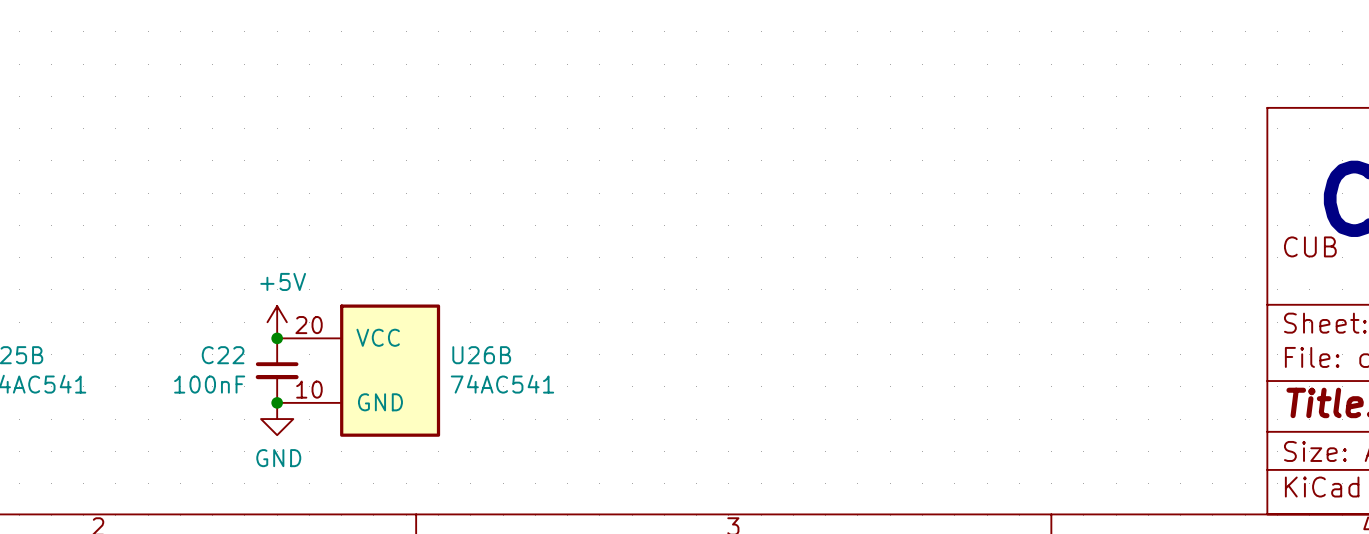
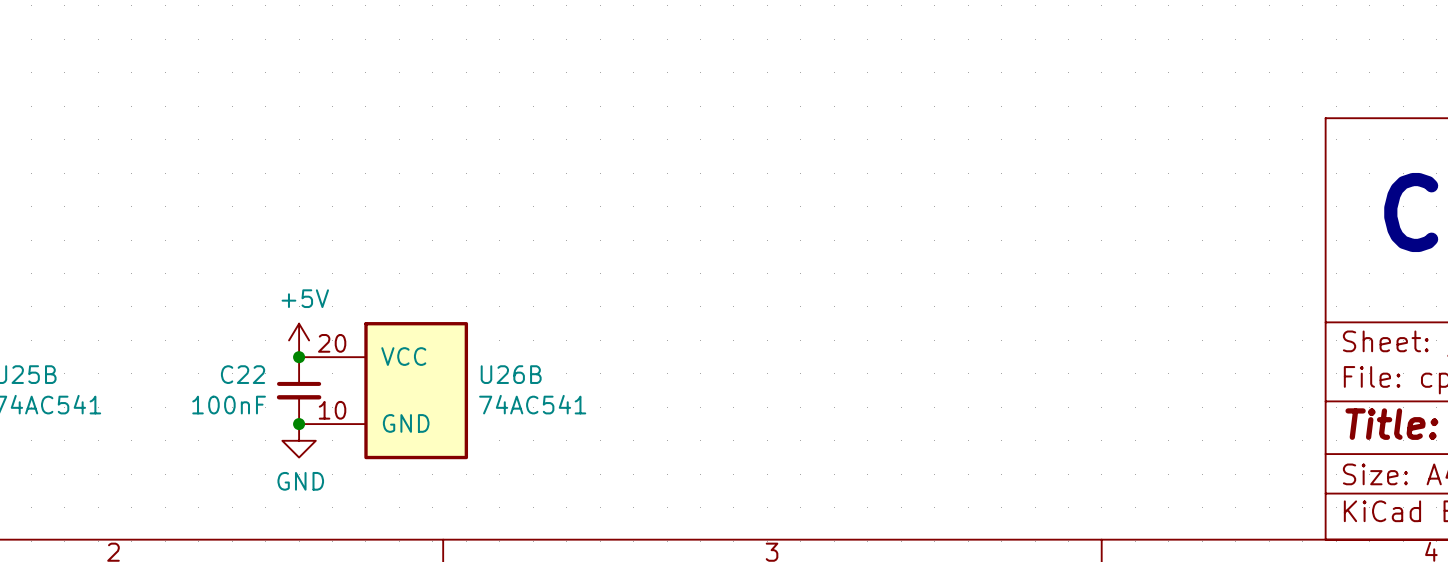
title block: CUB (1310, 246) -> none

